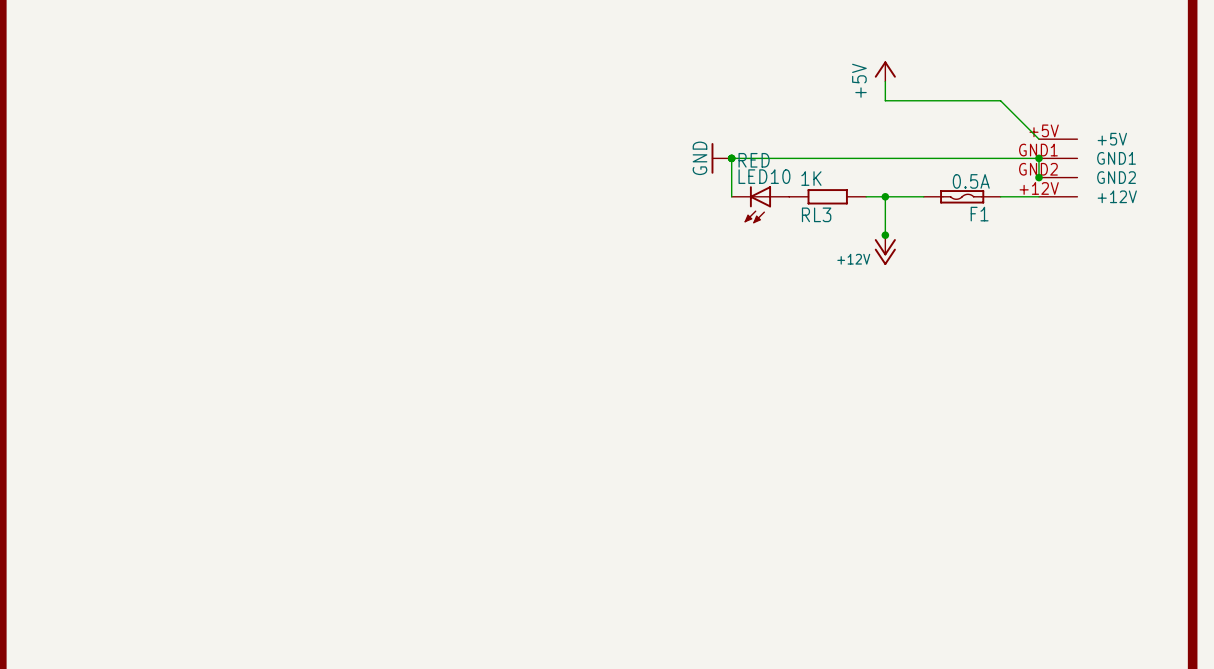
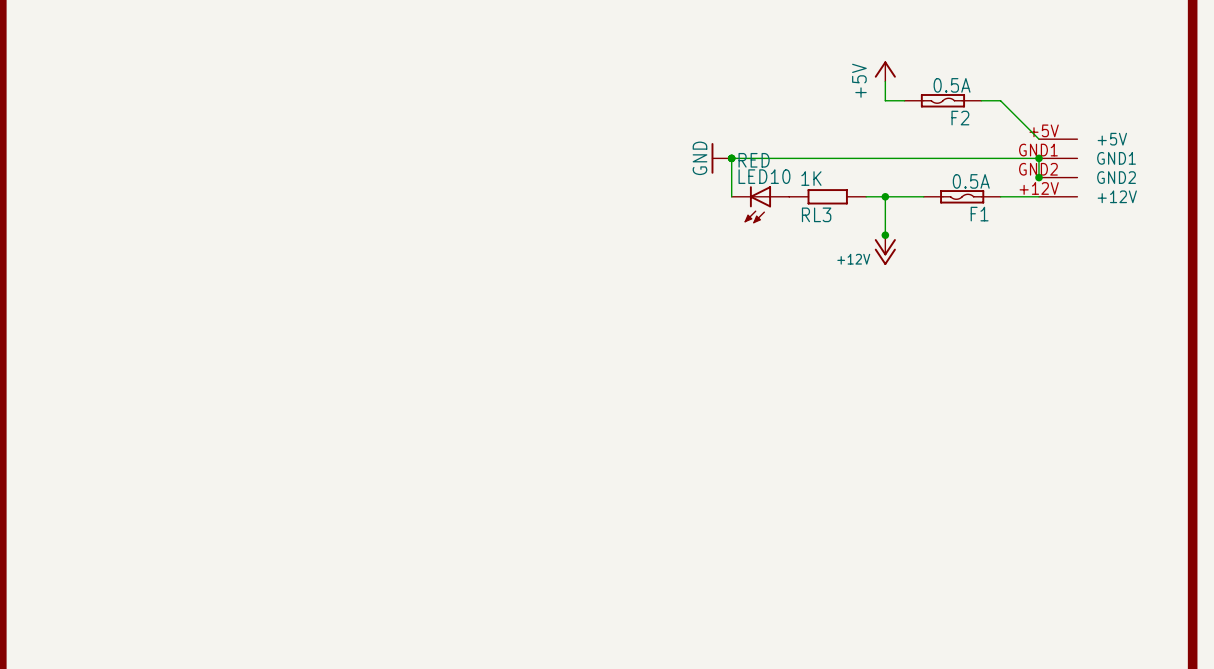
F2: none -> 0.5A (942, 100)

